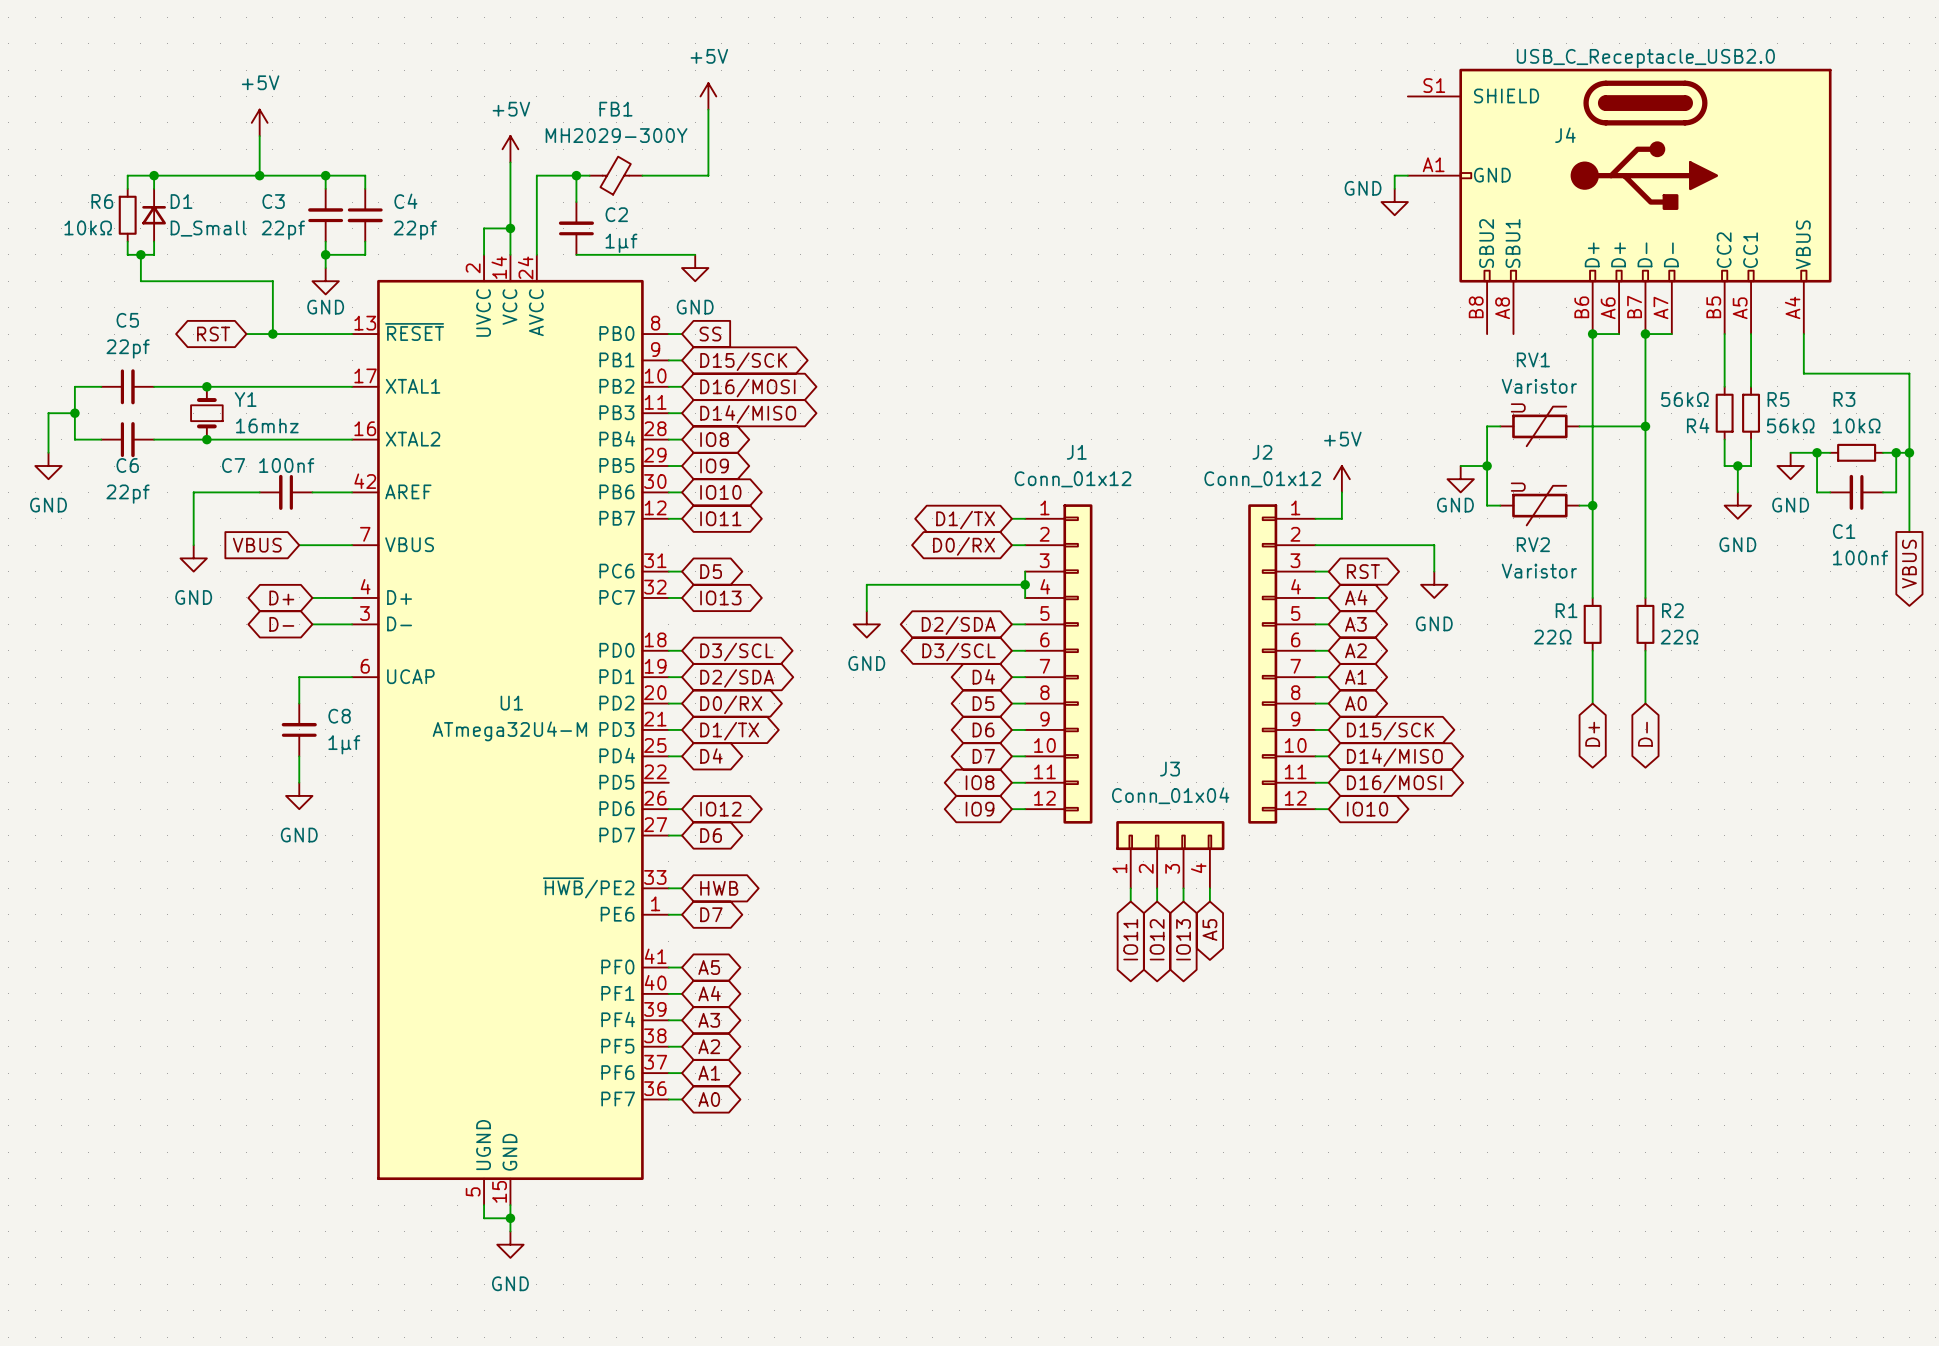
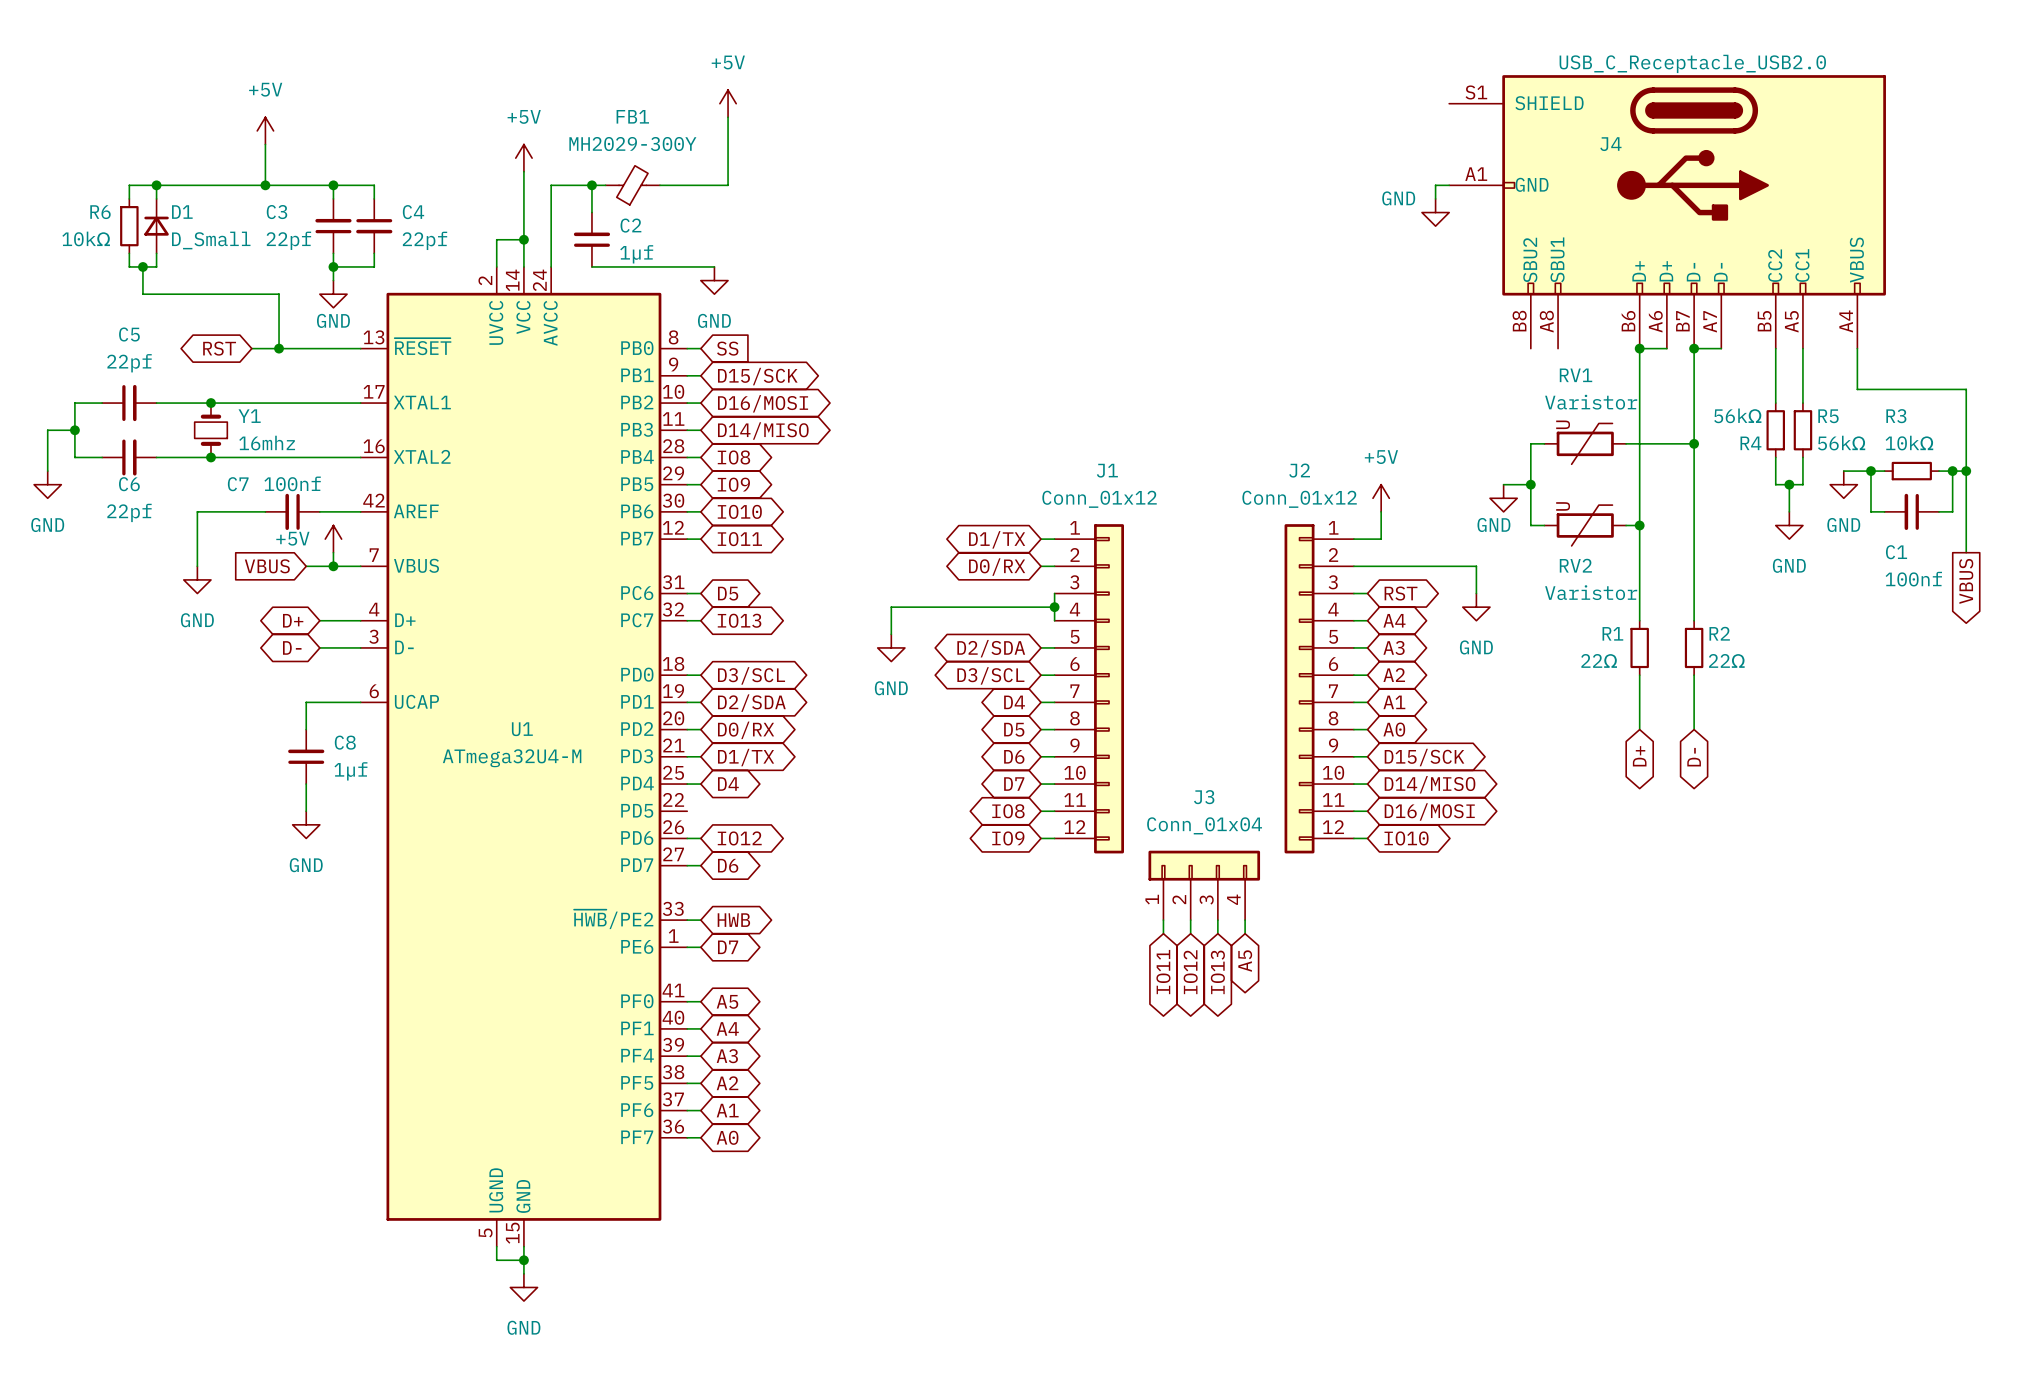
power symbol: none -> +5V (333, 539)
wire: none -> (333, 552) (333, 566)
junction: none -> (333, 566)

